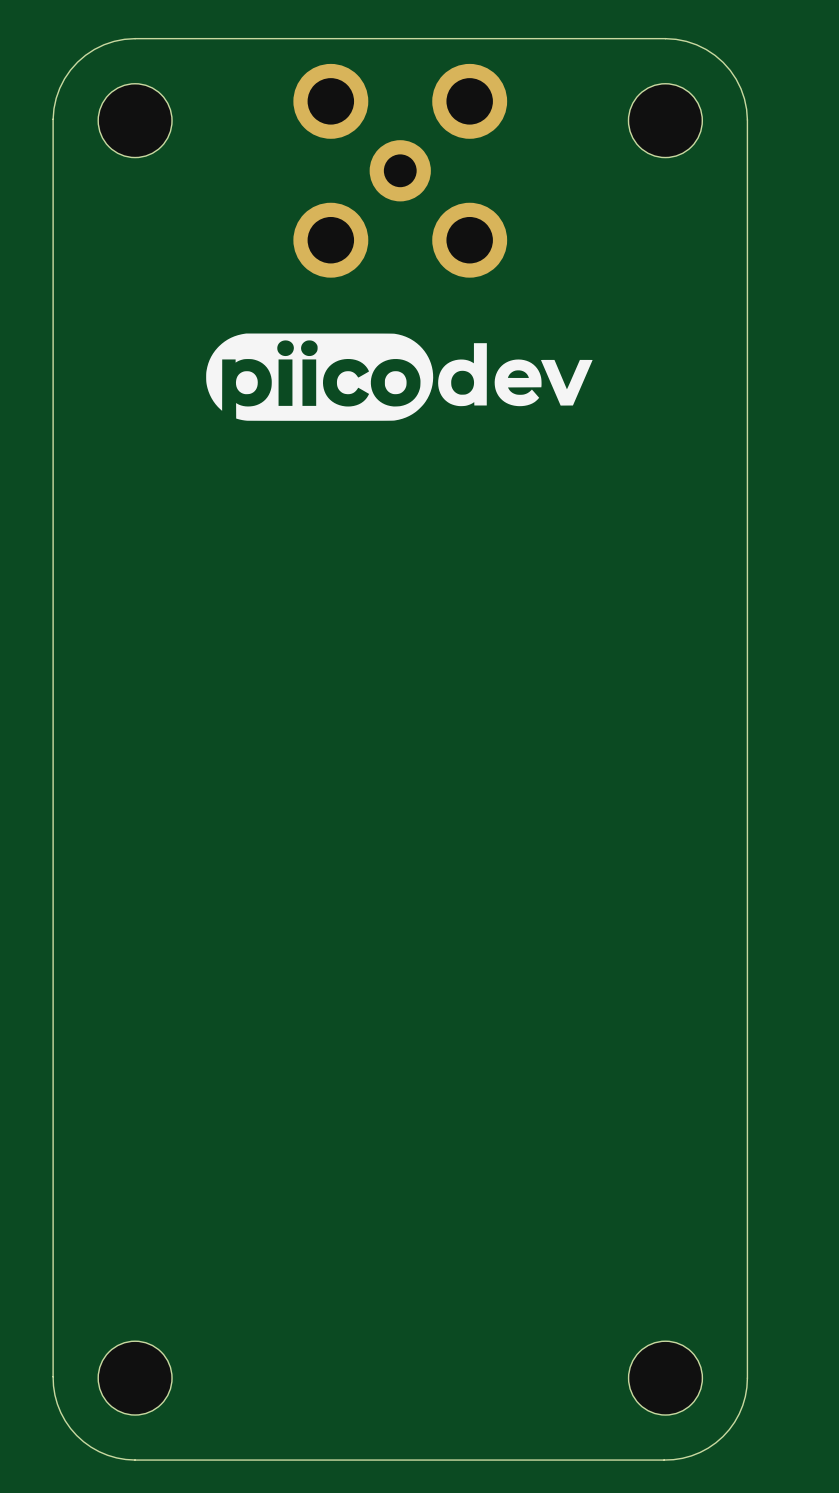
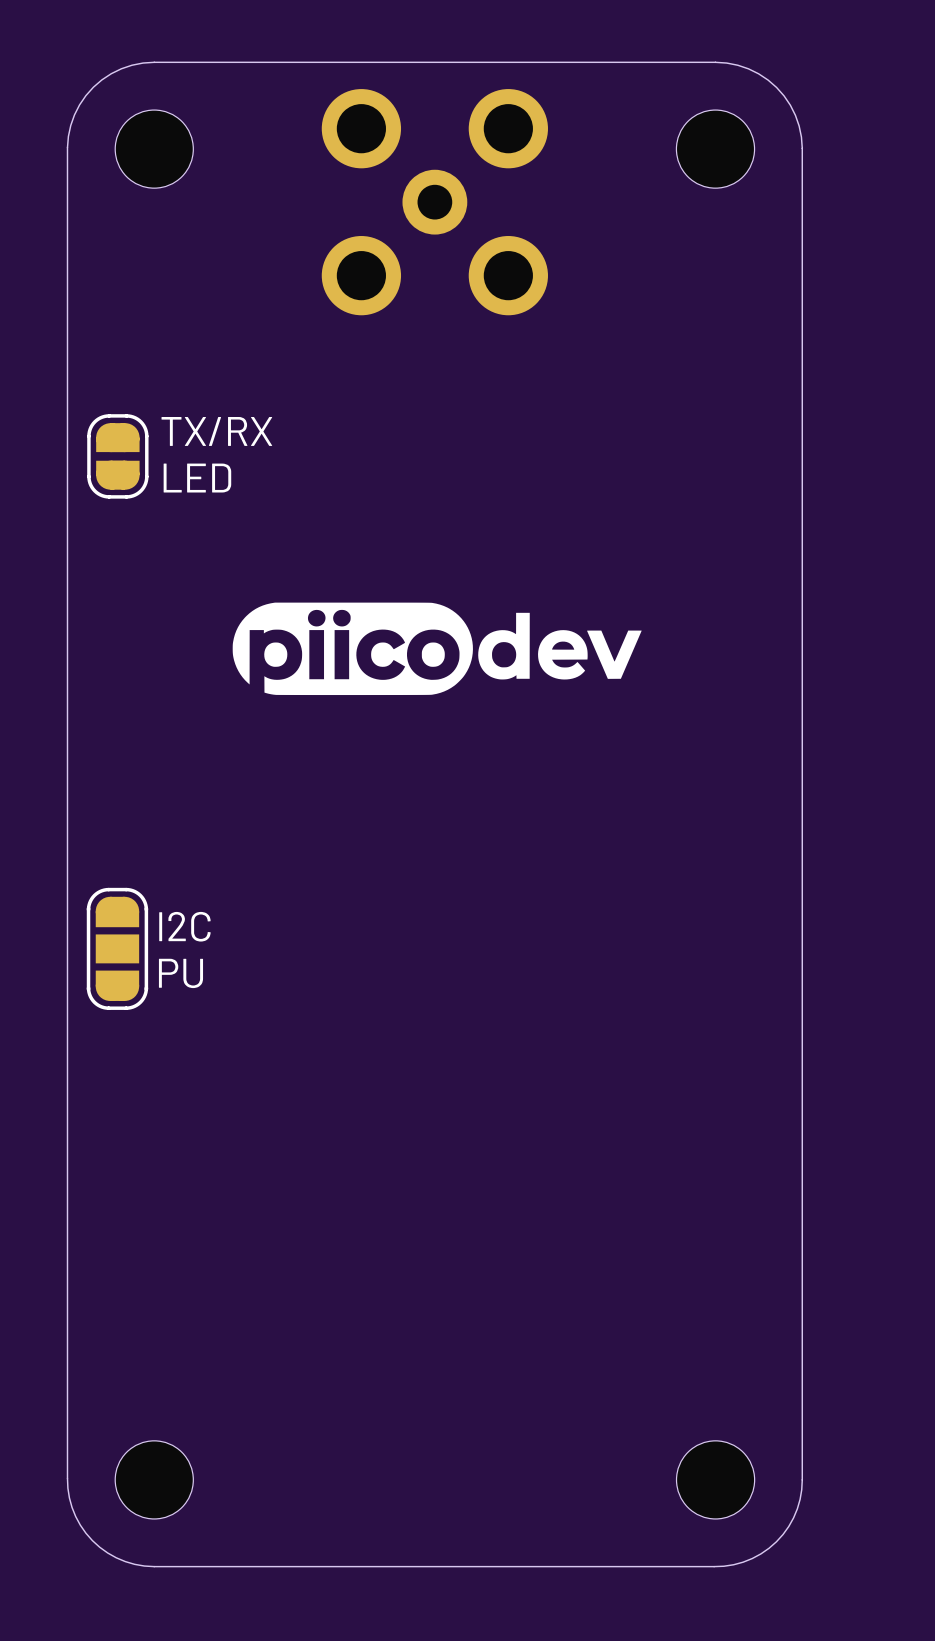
drawing position: (399, 377) -> (437, 648)
text: none -> TX/RX (216, 431)
part: none -> (117, 456)
text: none -> LED (197, 478)
text: none -> I2C (184, 926)
part: none -> (117, 948)
text: none -> PU (180, 973)

